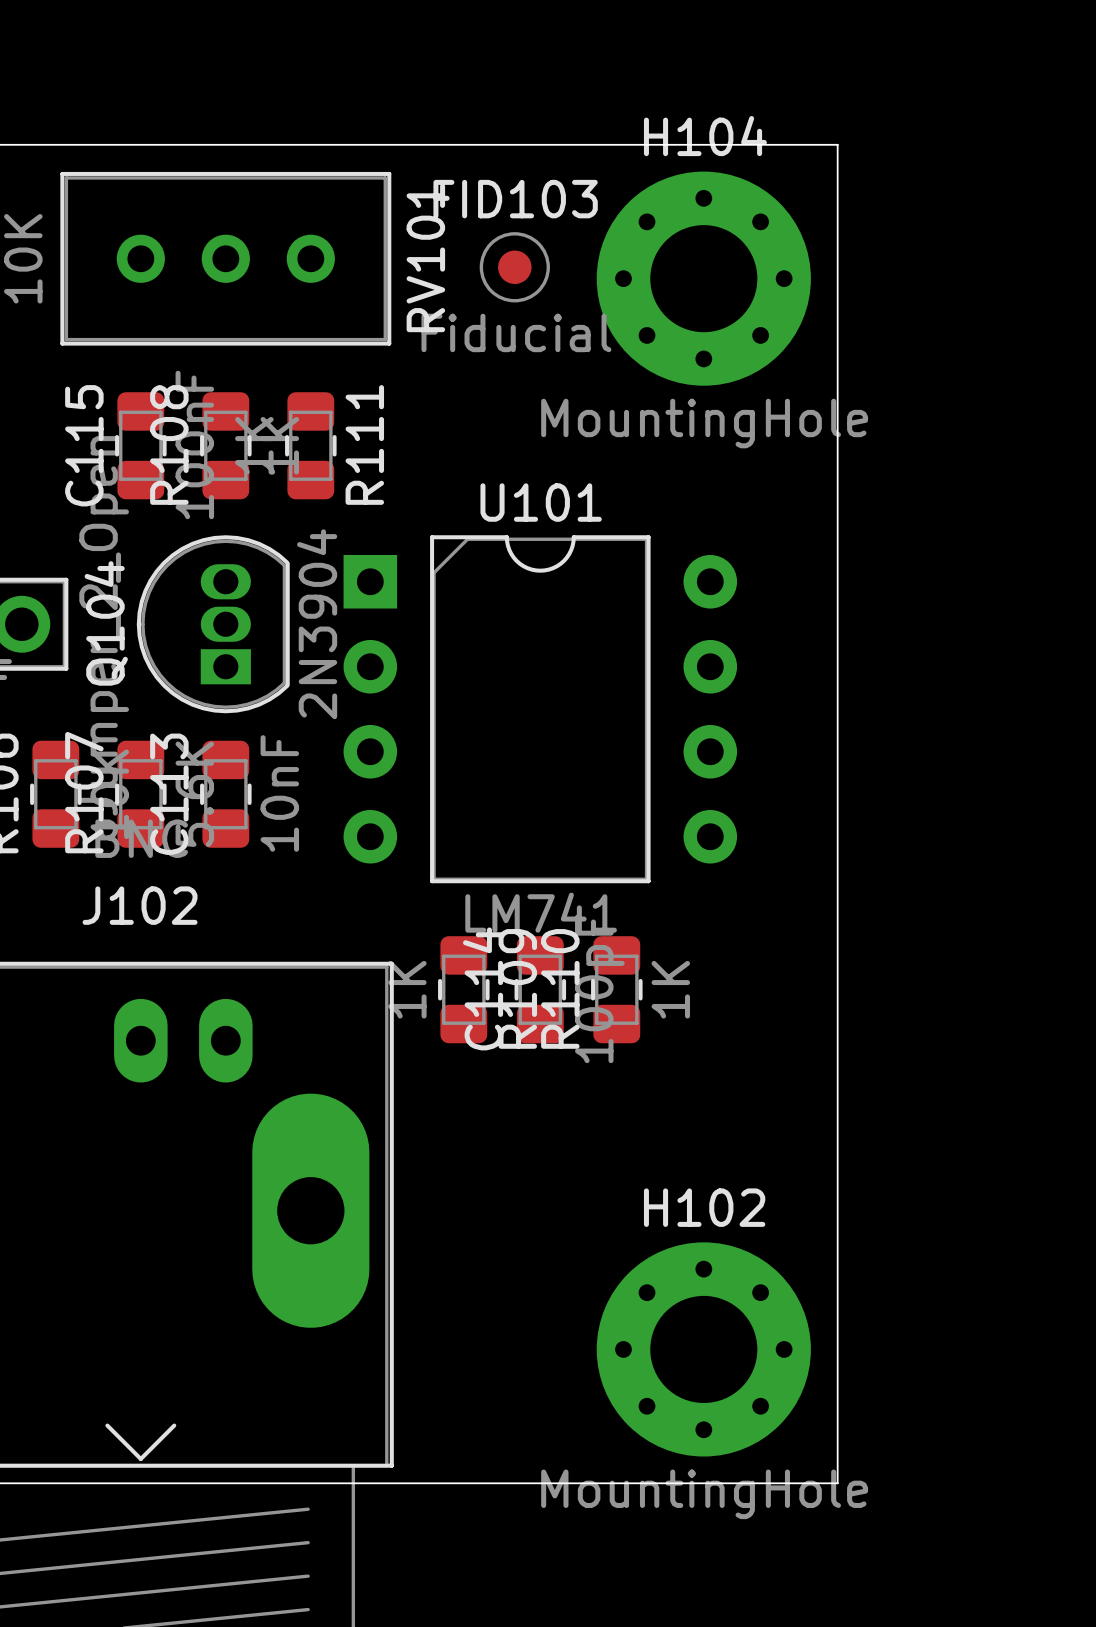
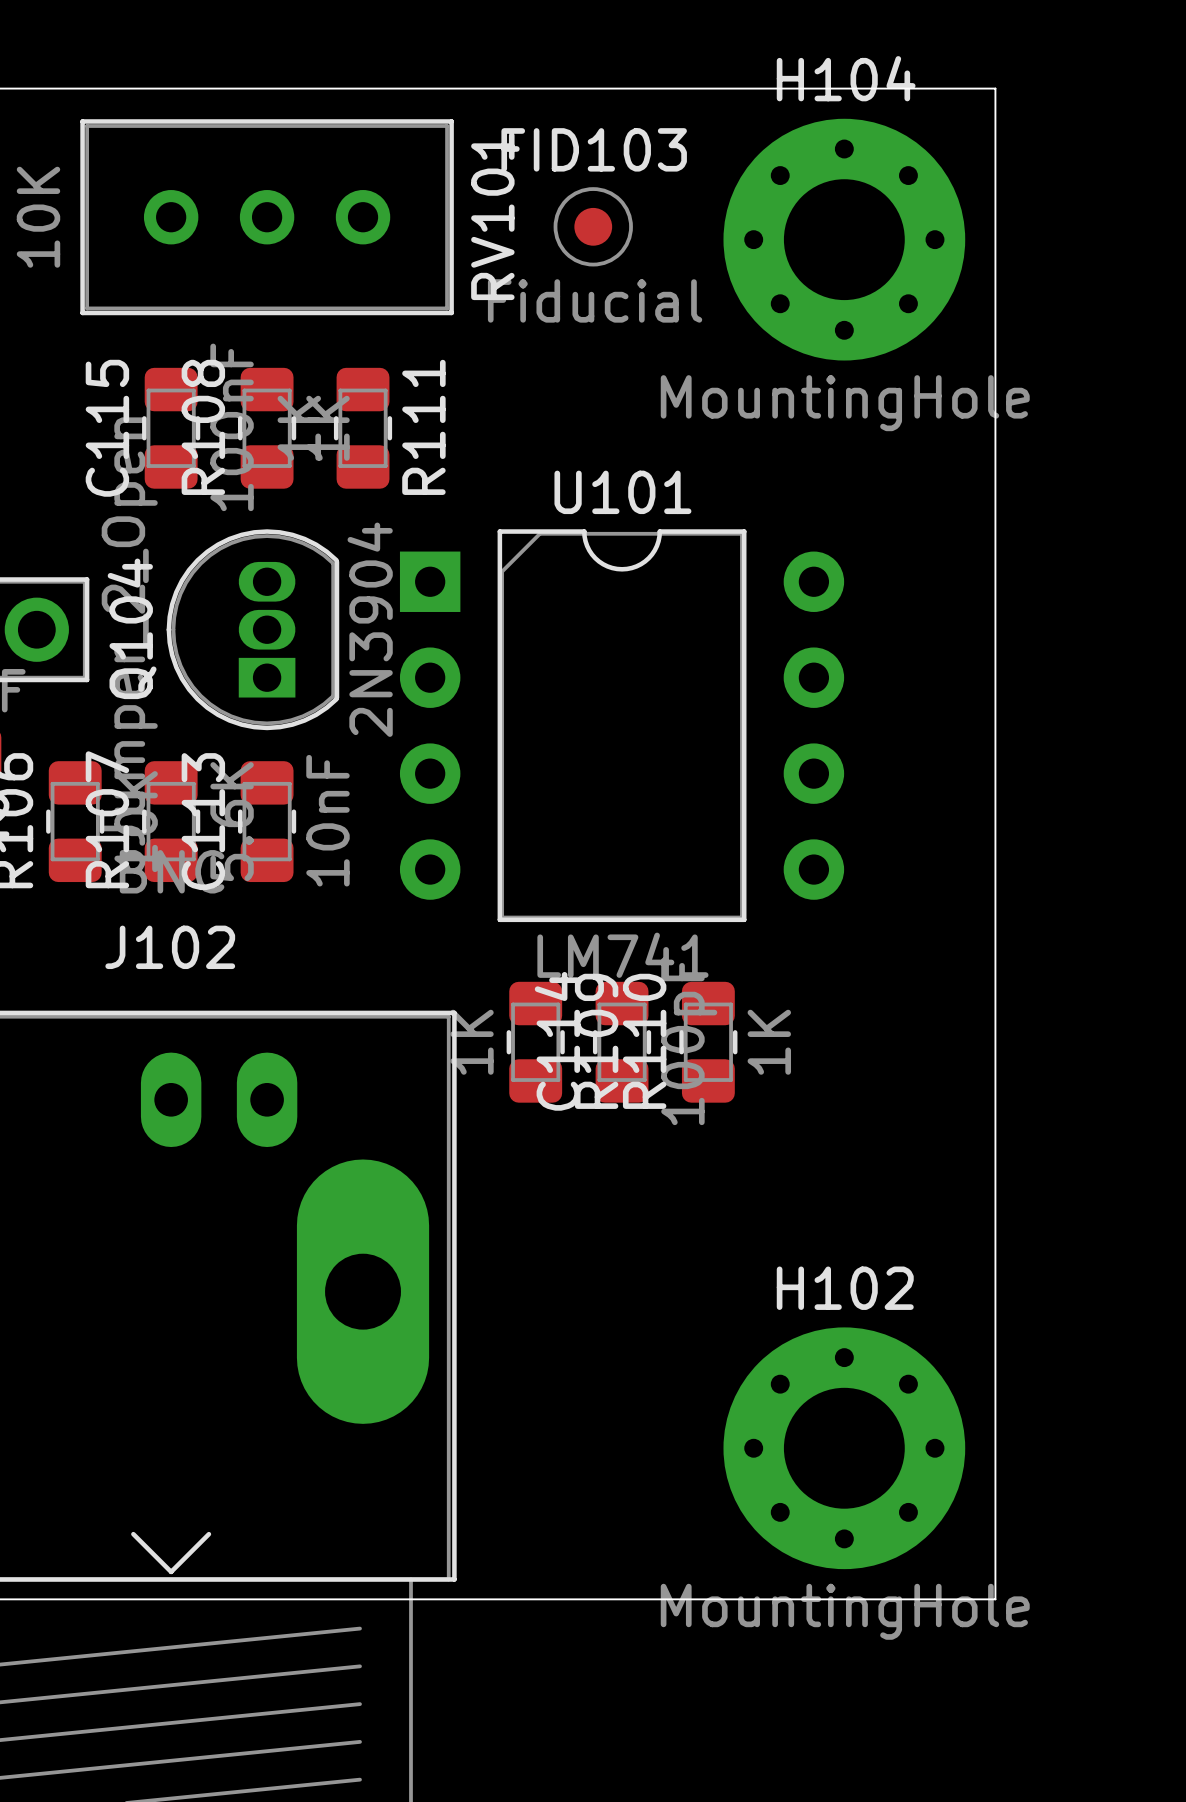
board edge: (837, 144) (837, 1483) -> (957, 88) (995, 88) (995, 1599) (957, 1599)
H104 position: (703, 278) -> (844, 239)
H102 position: (703, 1349) -> (844, 1448)

